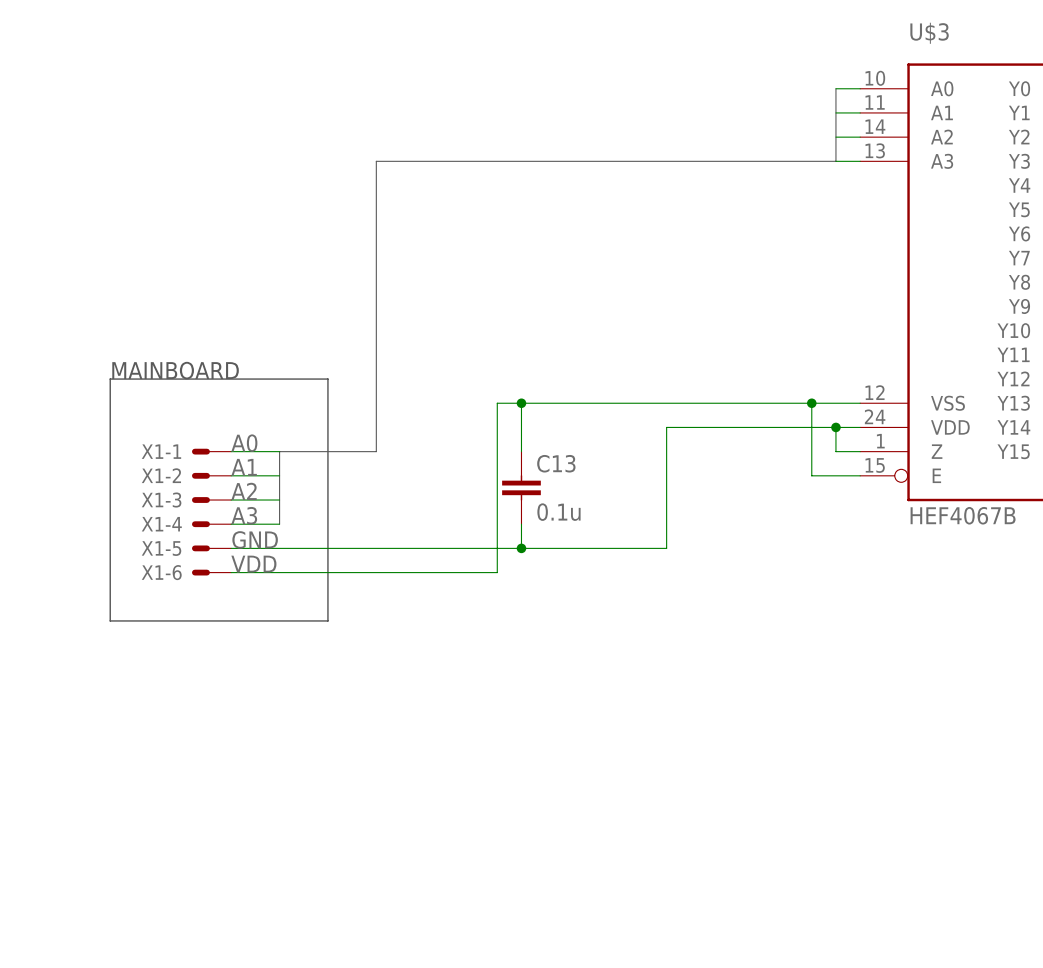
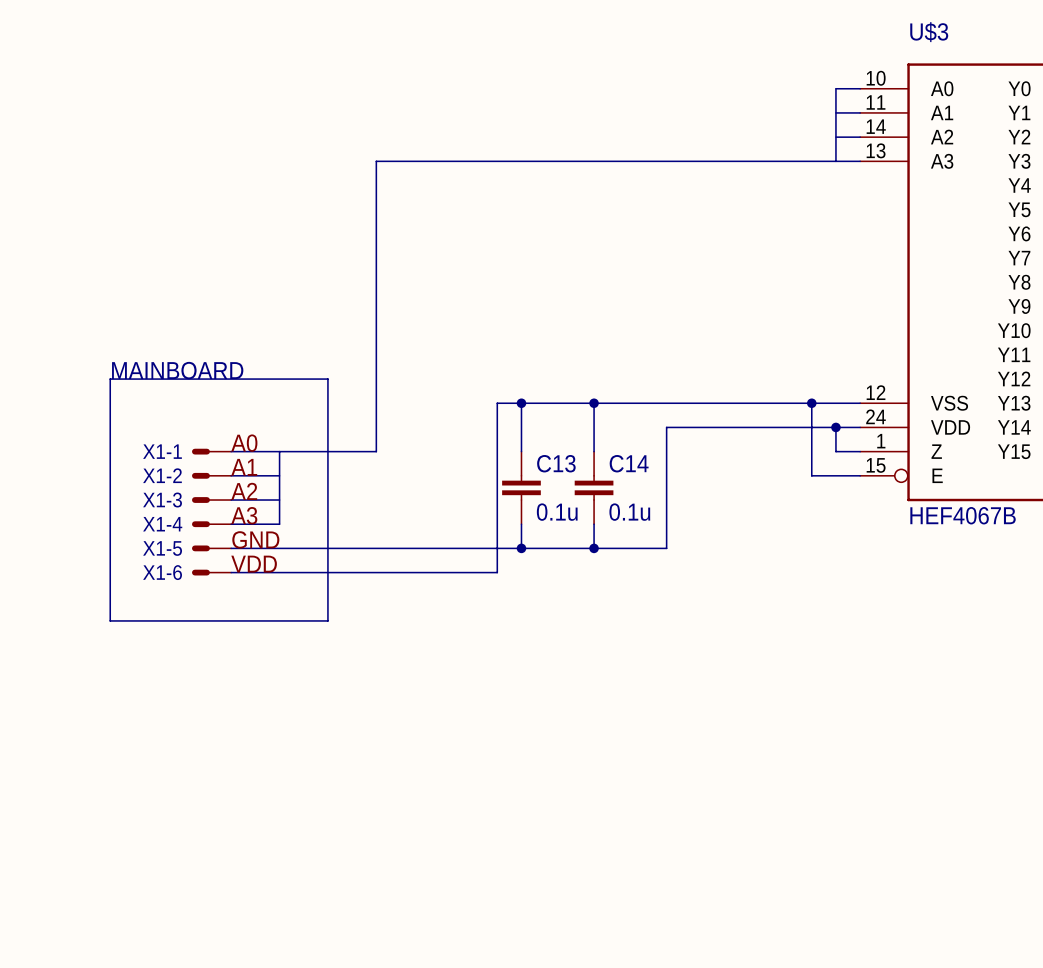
wire: none -> (594, 403) (594, 451)
junction: none -> (594, 403)
C14: none -> 0.1u (594, 487)
wire: none -> (594, 524) (594, 548)
junction: none -> (594, 548)

